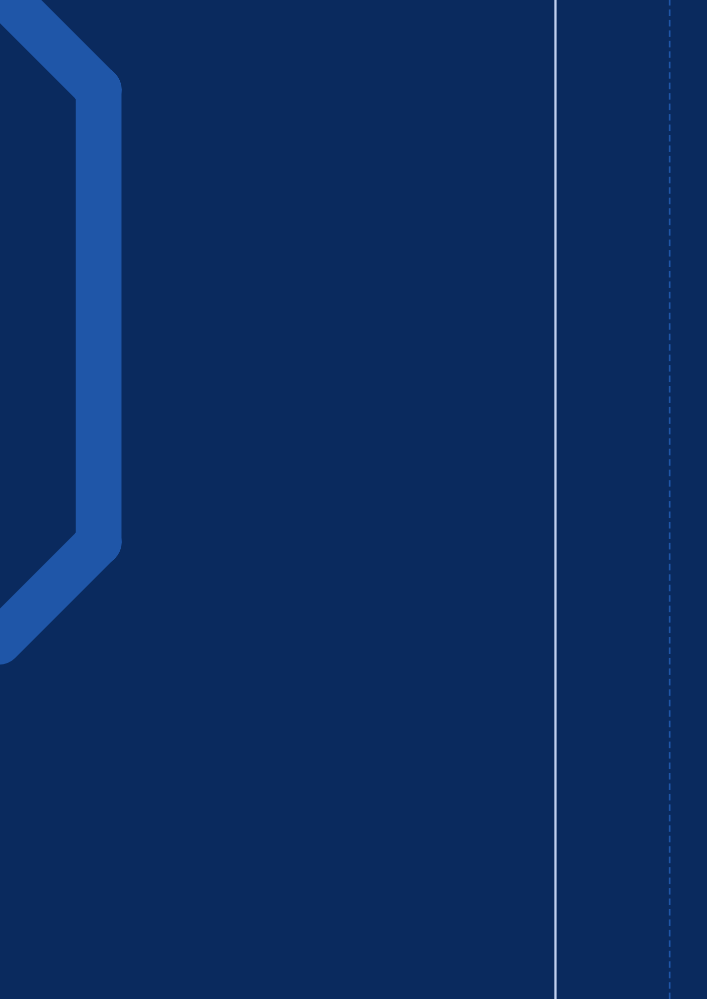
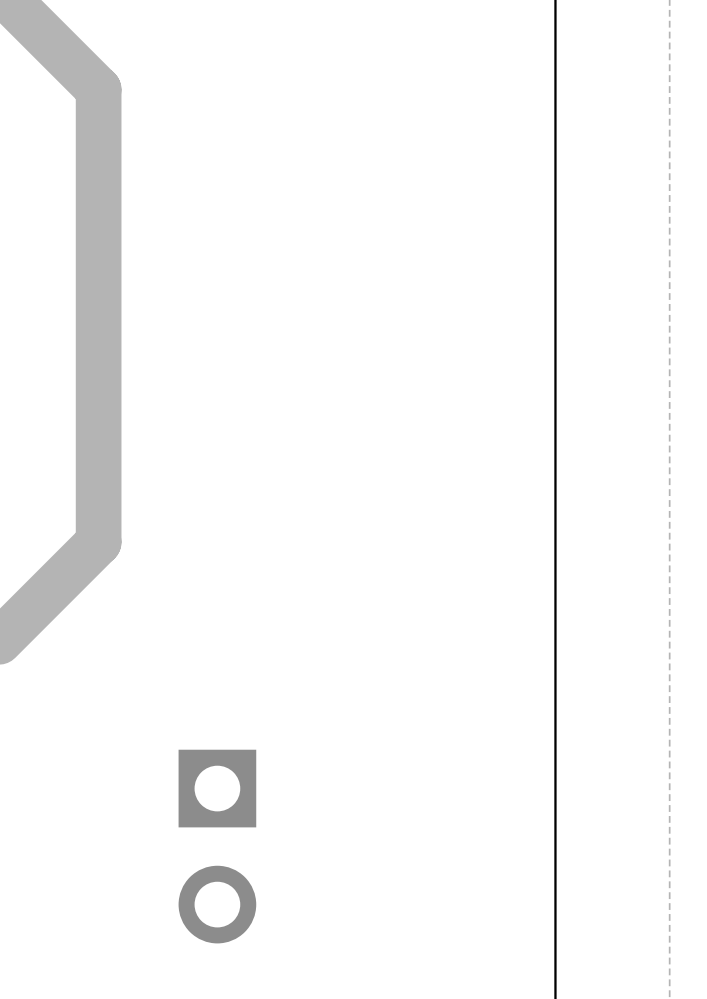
part: none -> (217, 846)

